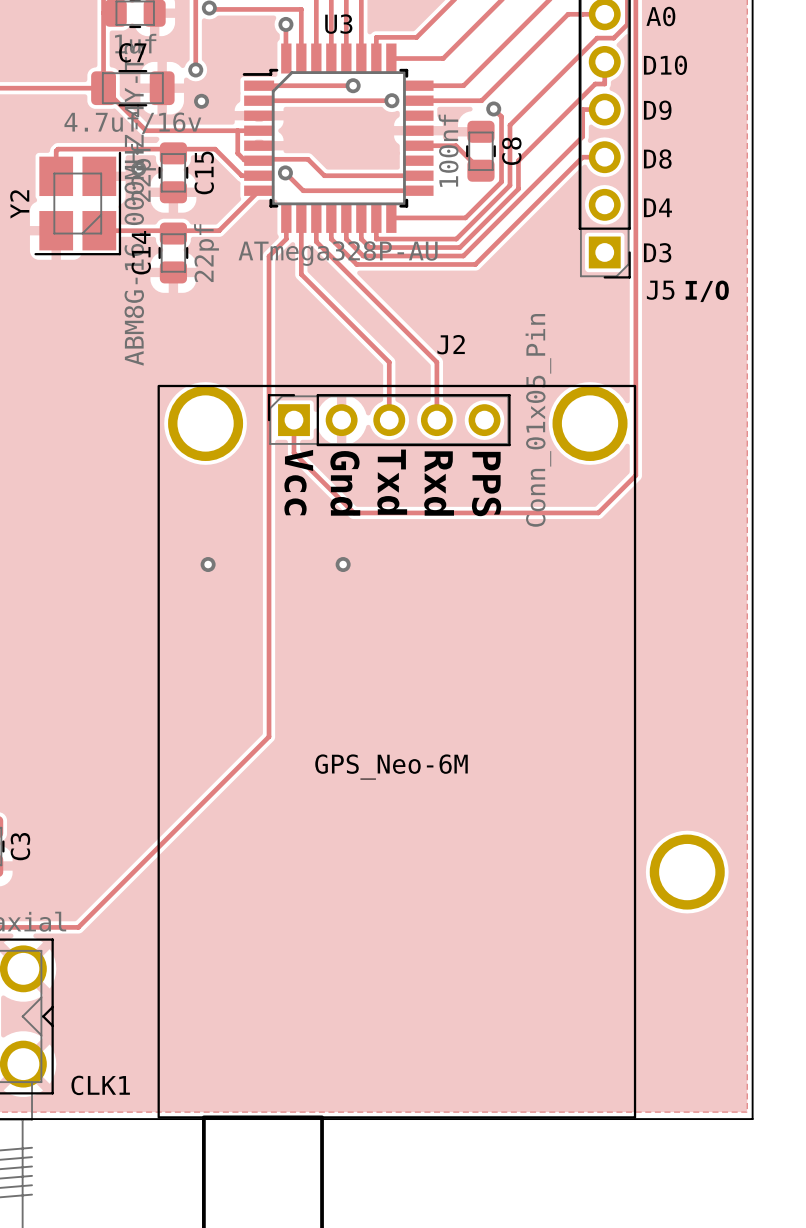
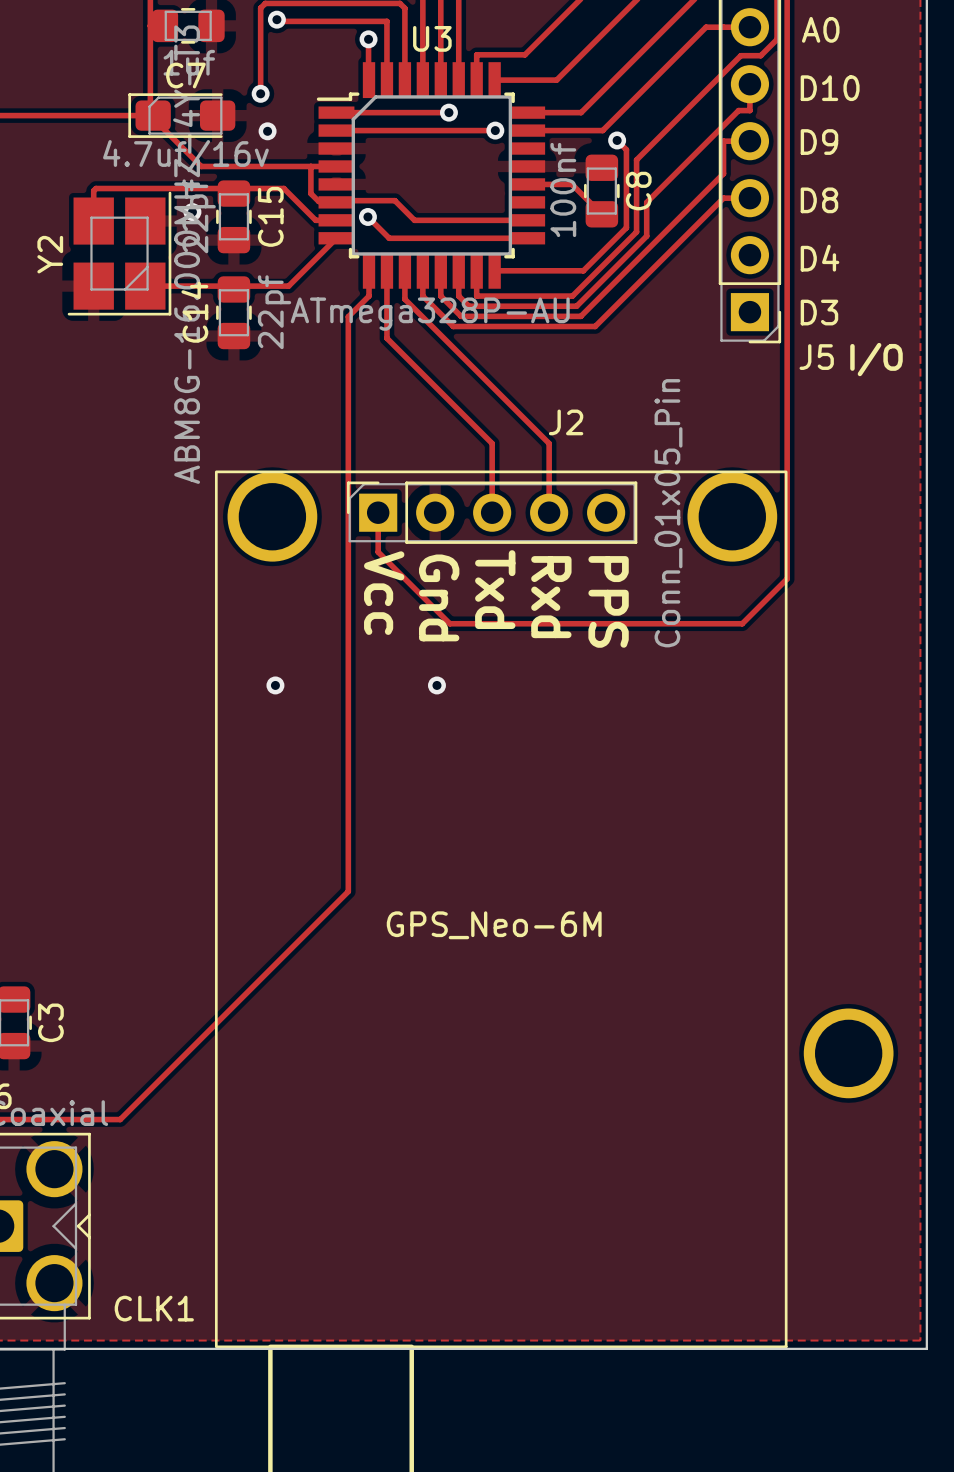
C7 footprint: [91, 70, 175, 107] -> [128, 93, 236, 138]

